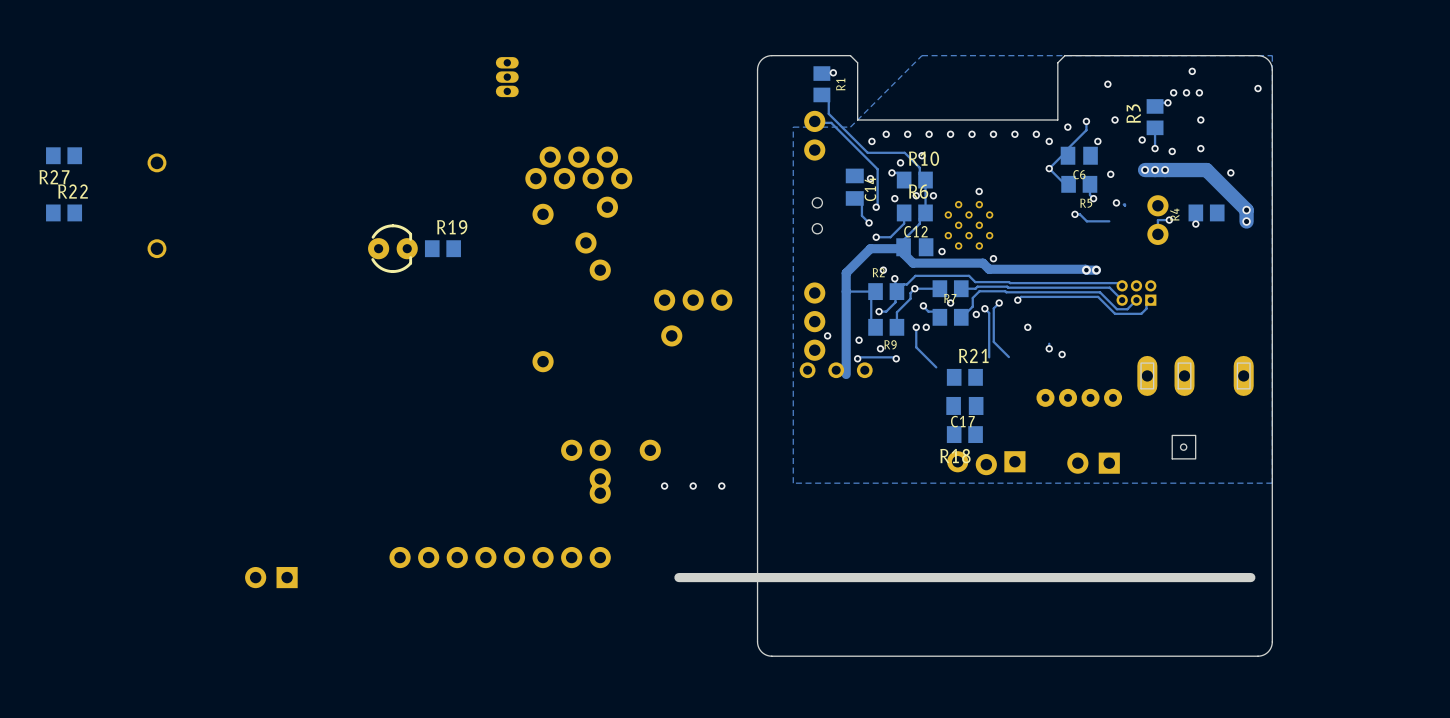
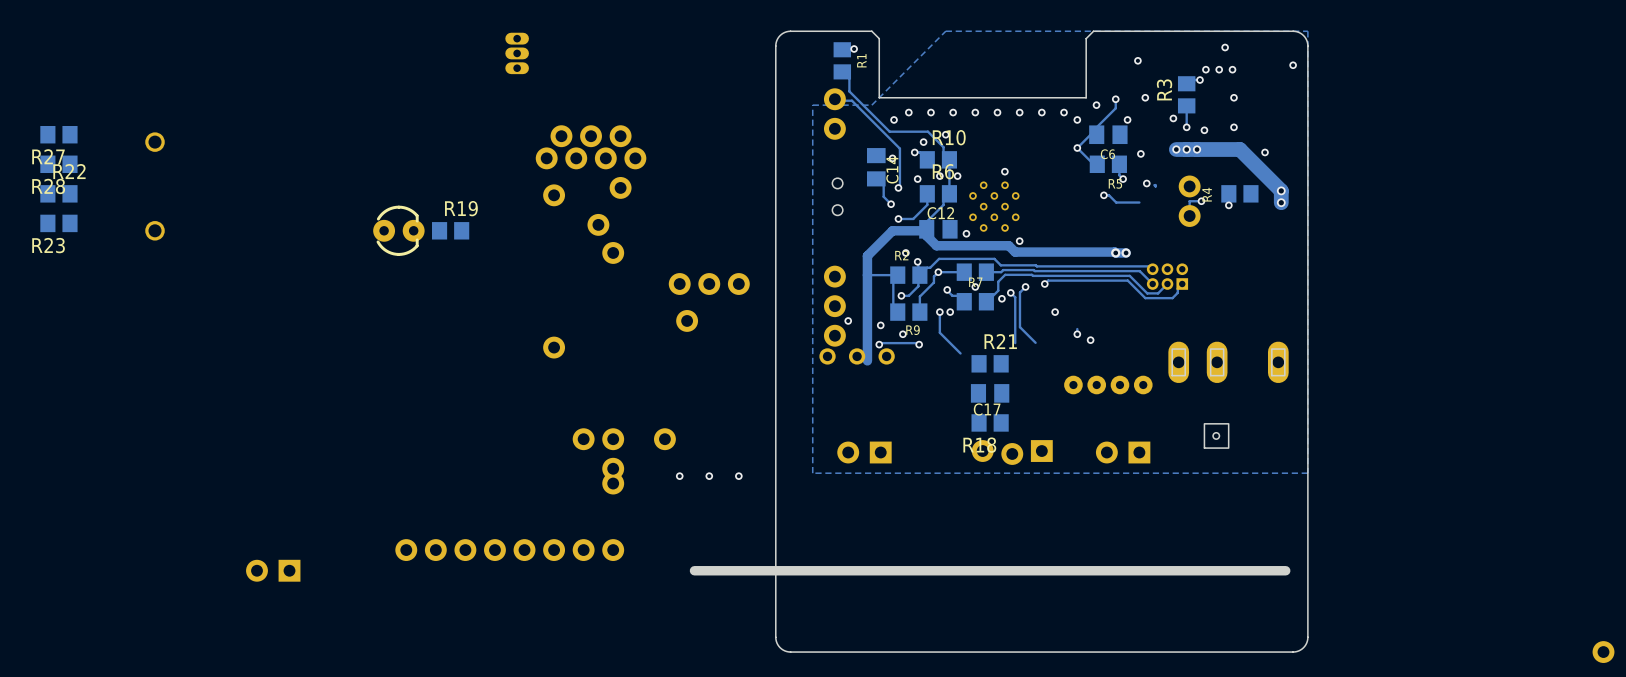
R28: none -> (58, 164)
R23: none -> (58, 223)
part: none -> (864, 452)

